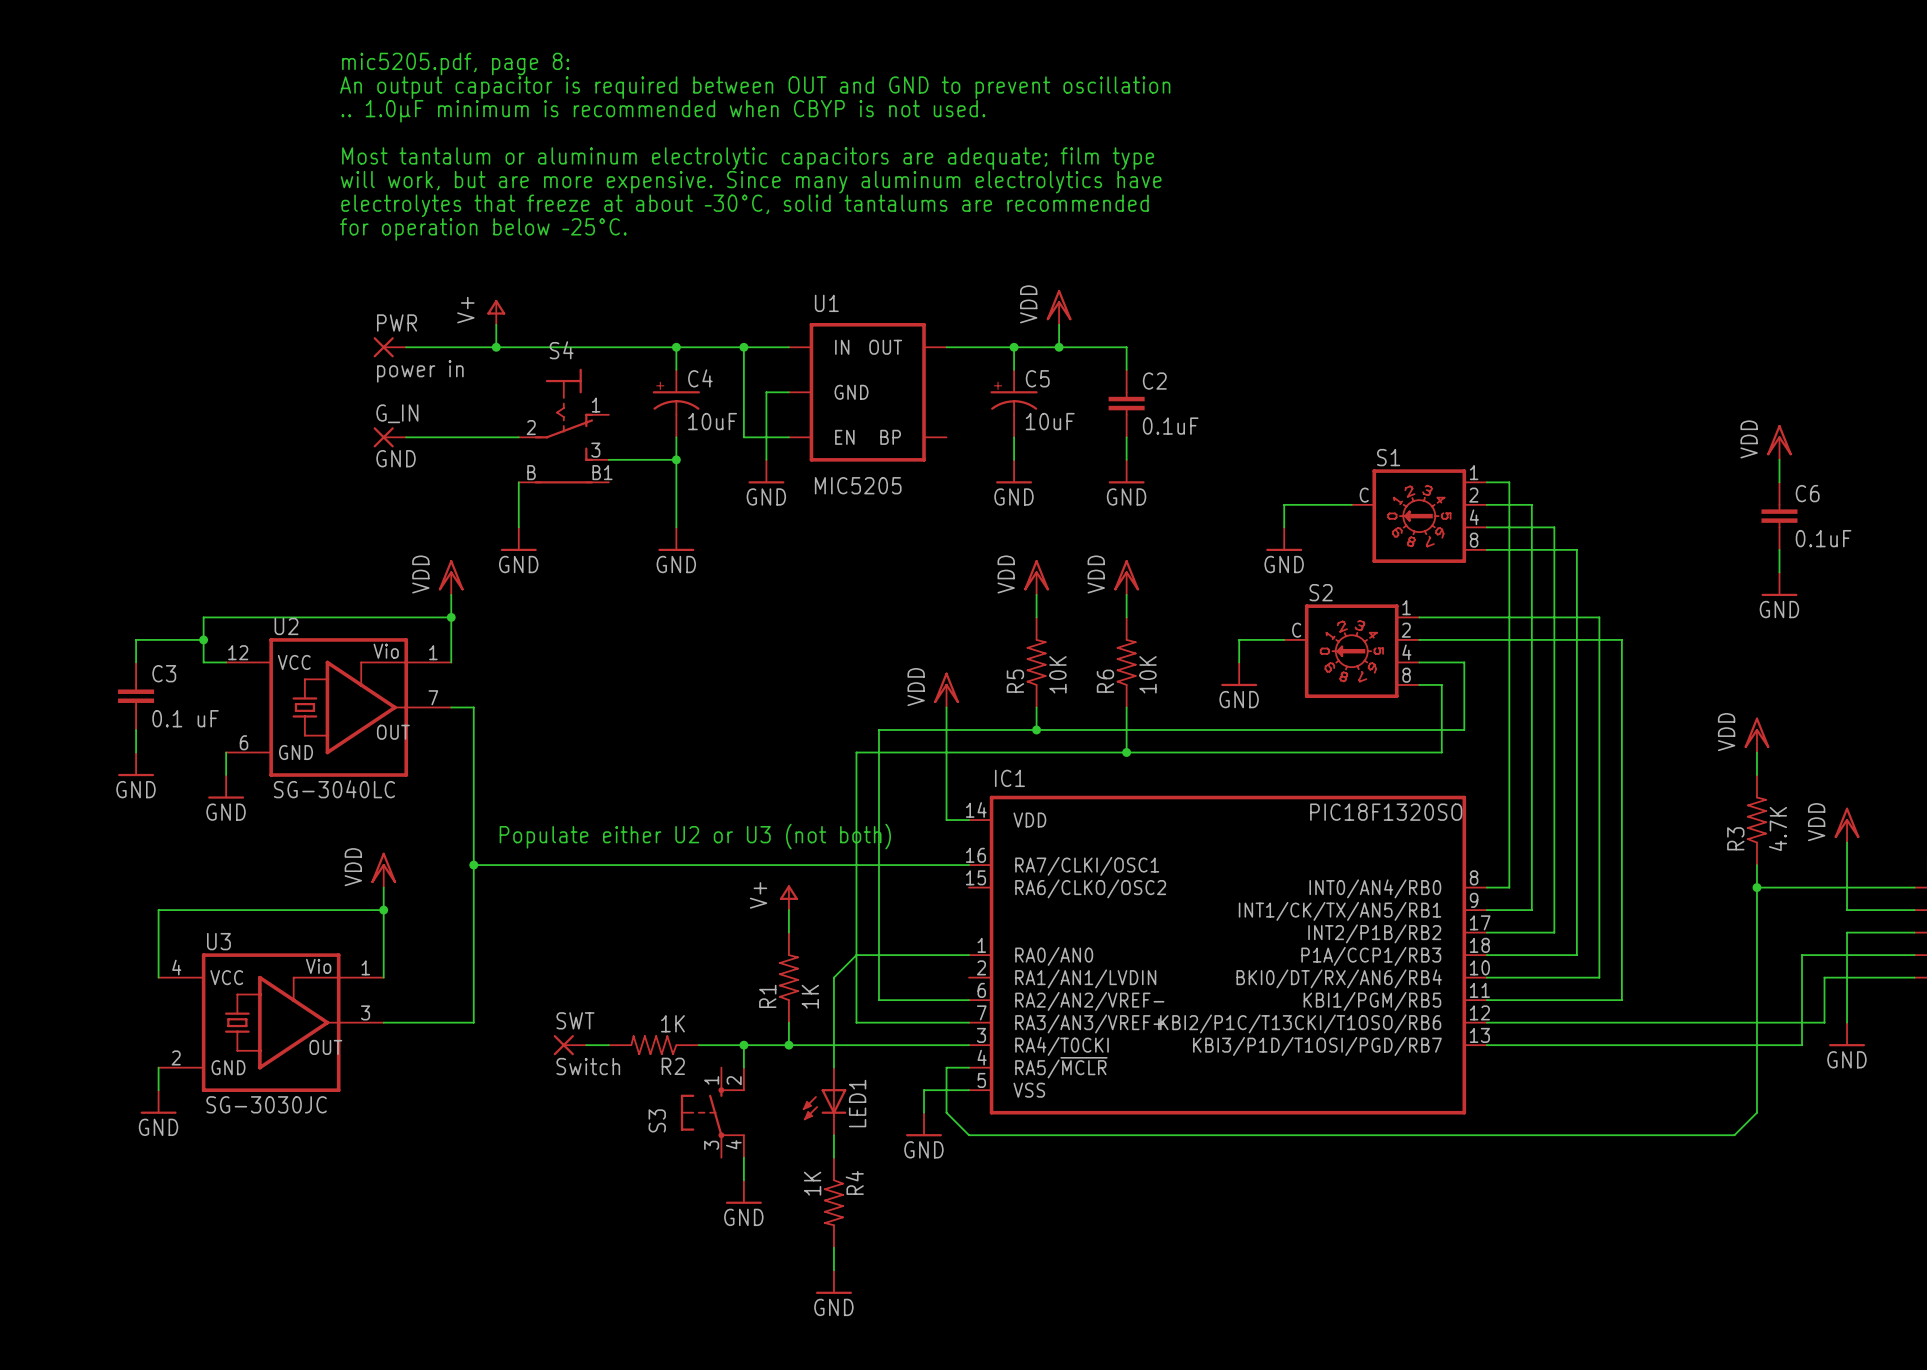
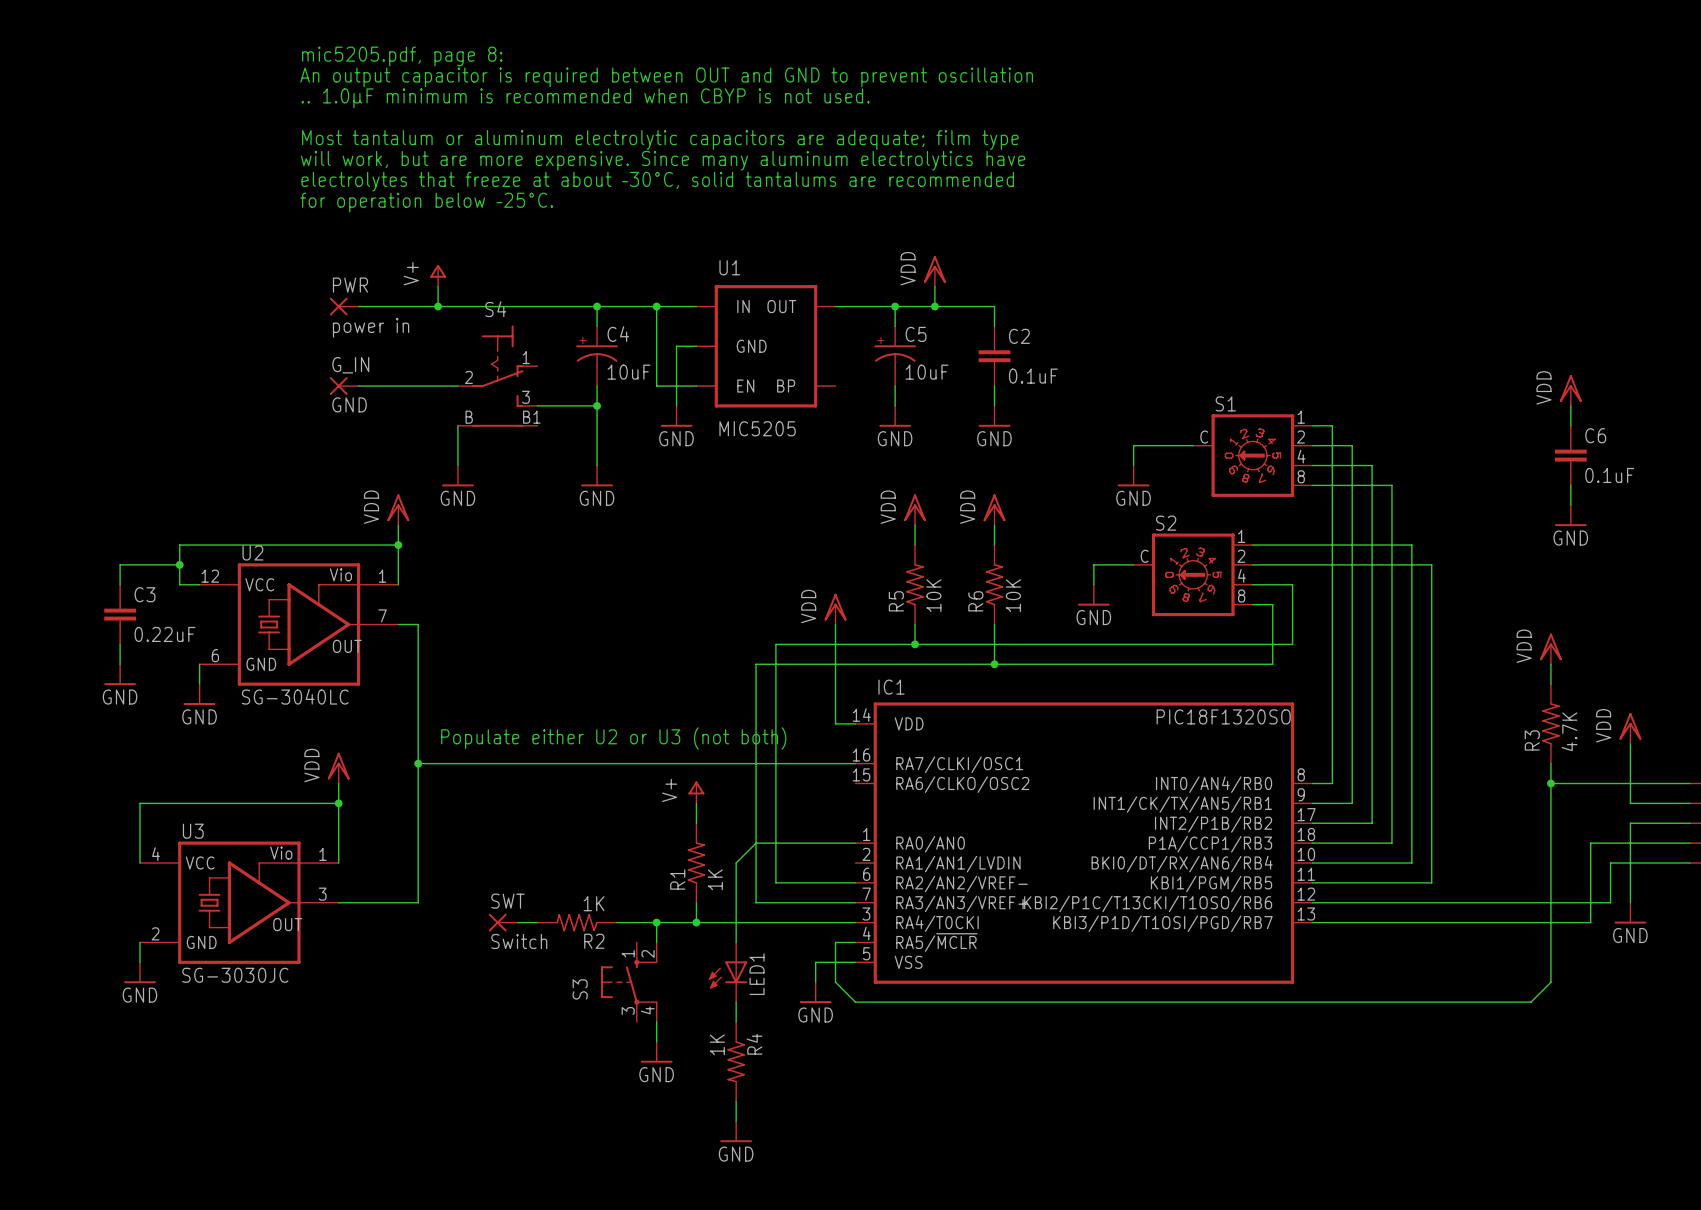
C3 value: 0.1 uF (185, 718) -> 0.22uF (164, 634)

